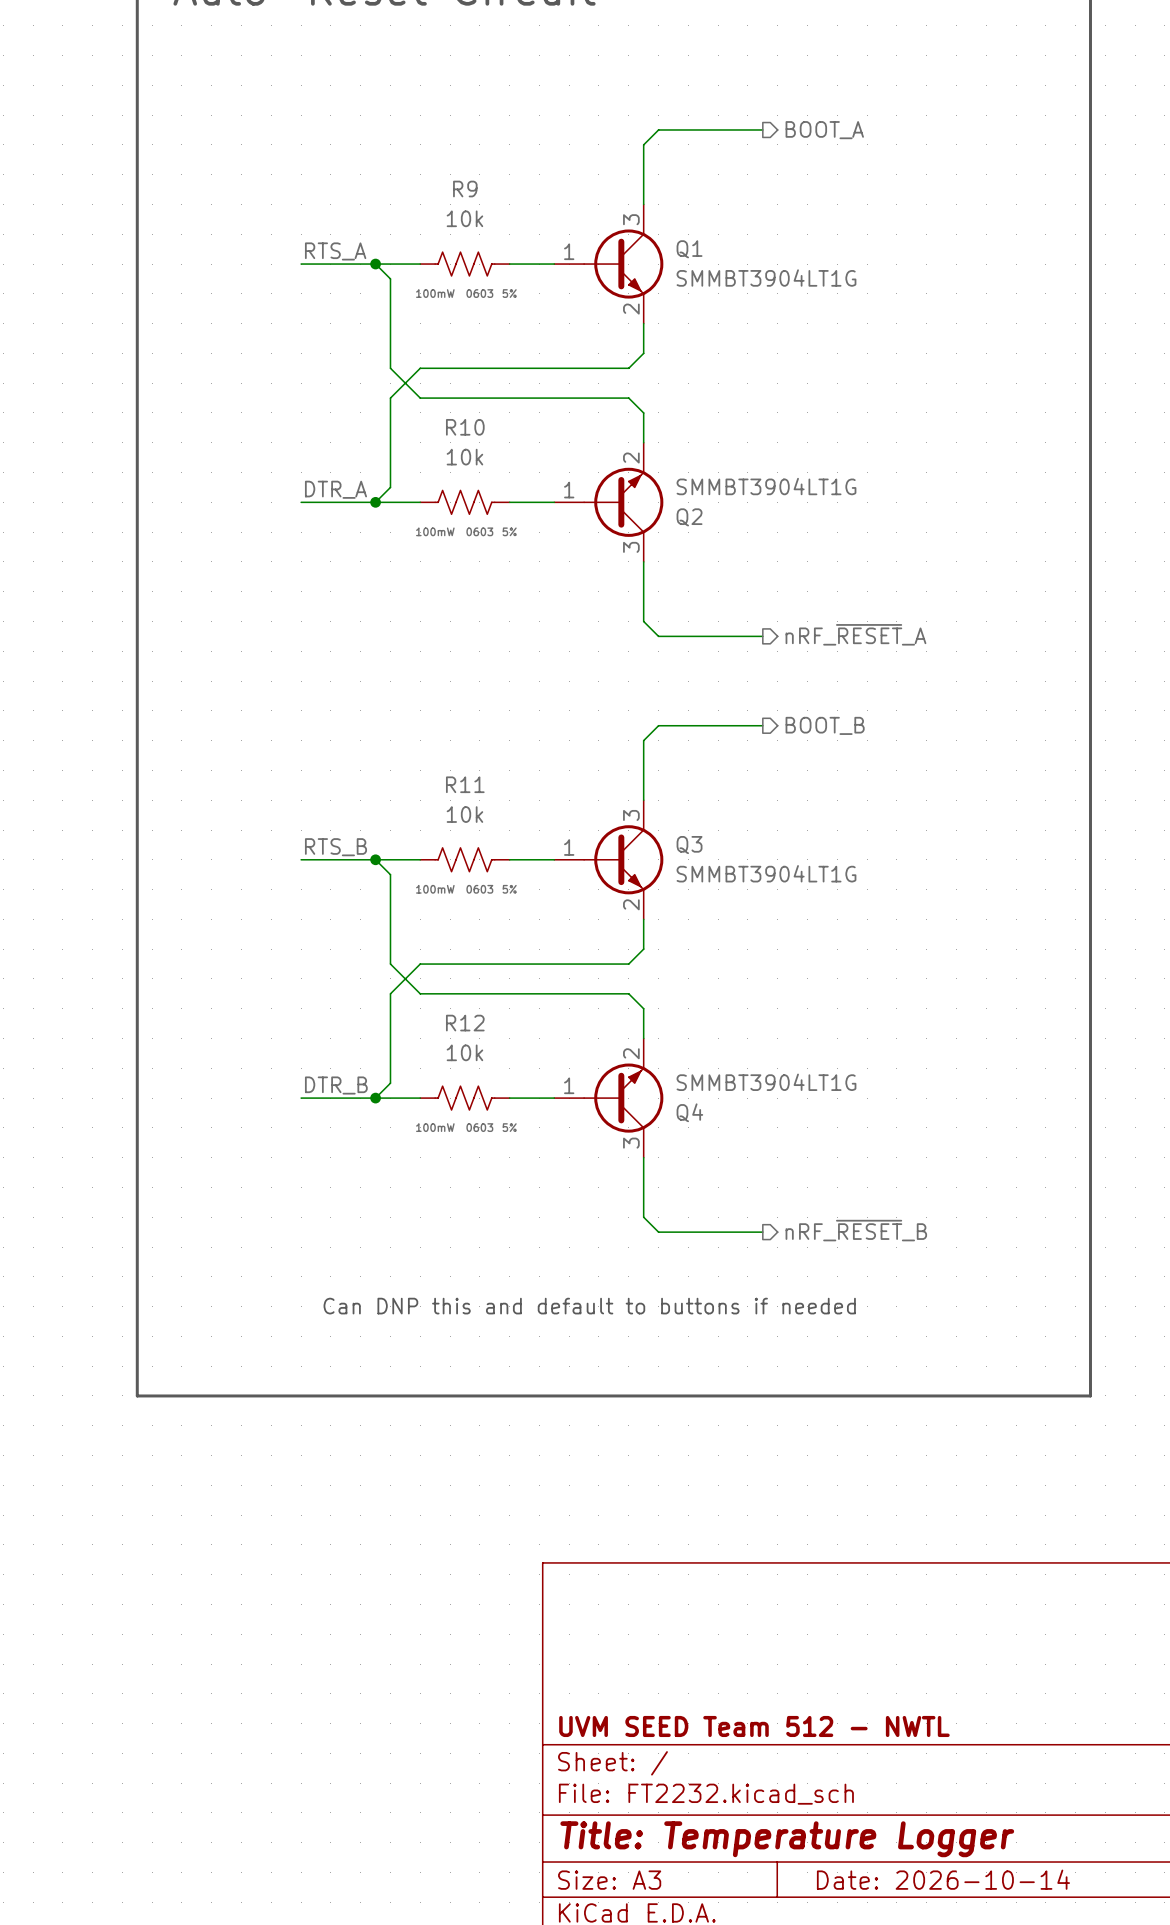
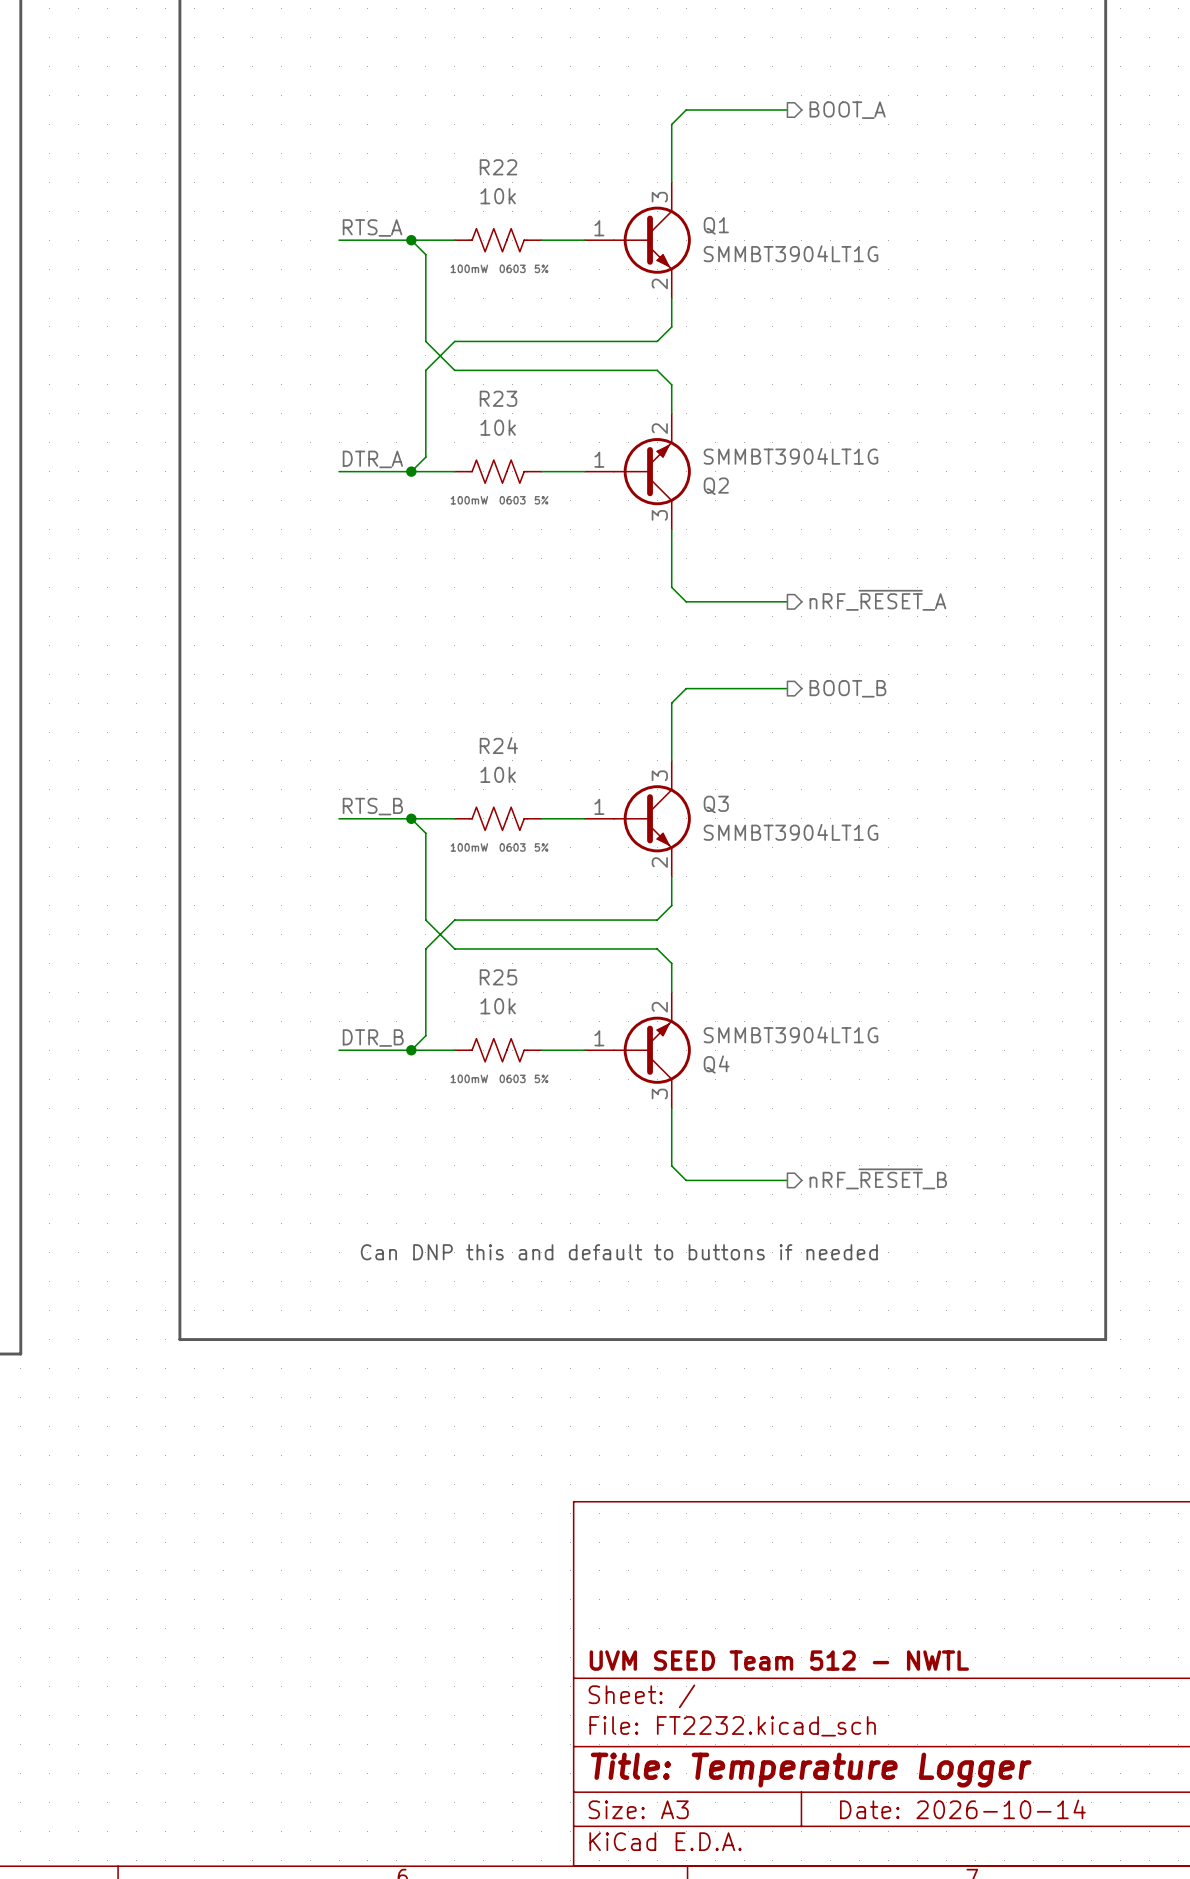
R9 name: R9 (465, 189) -> R22 (498, 167)
R10 name: R10 (465, 427) -> R23 (498, 398)
R11 name: R11 (465, 784) -> R24 (498, 745)
R12 name: R12 (465, 1023) -> R25 (498, 977)

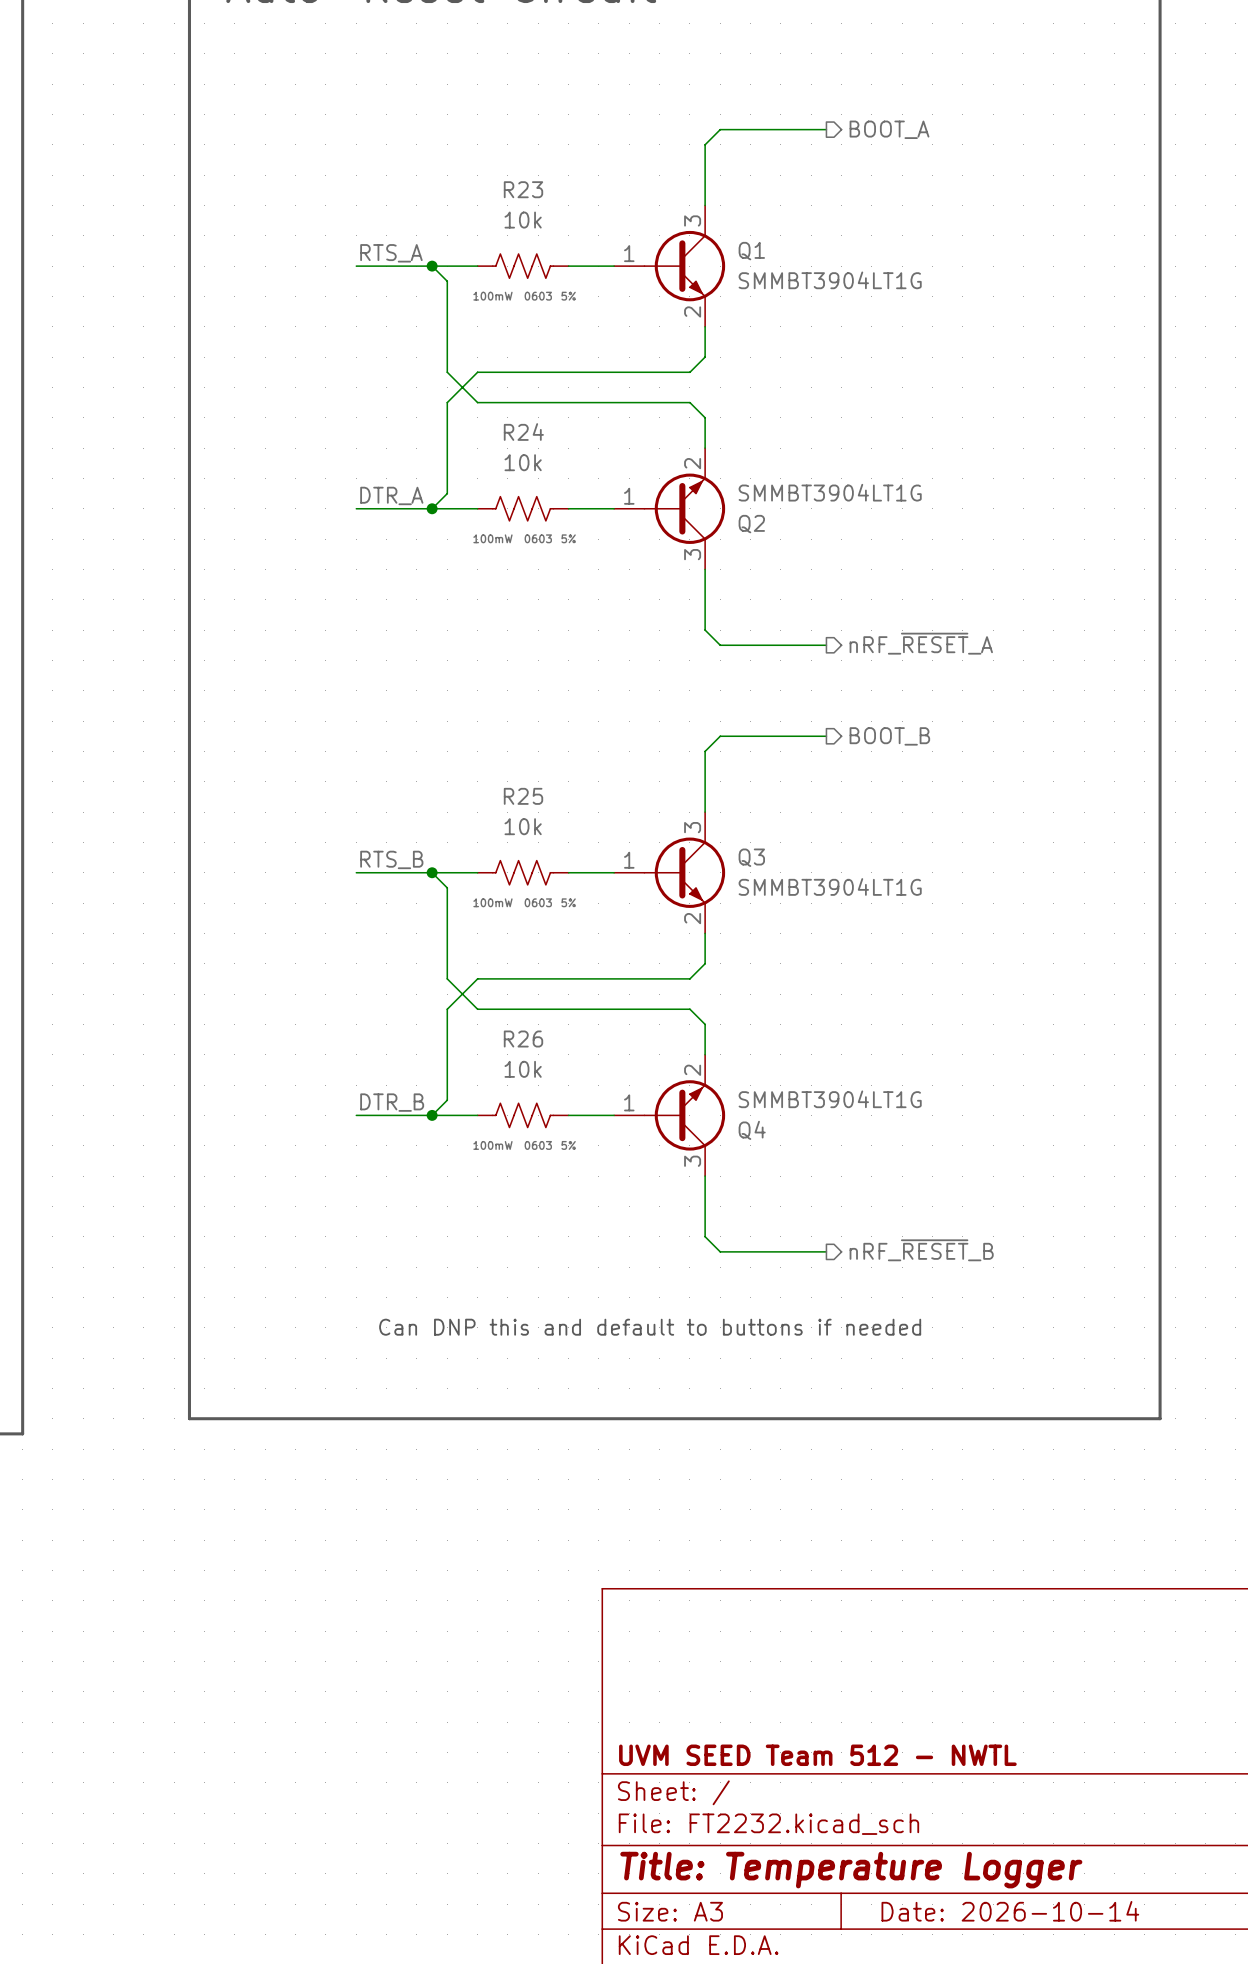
R22 name: R22 (498, 167) -> R23 (523, 189)
R23 name: R23 (498, 398) -> R24 (523, 432)
R24 name: R24 (498, 745) -> R25 (523, 796)
R25 name: R25 (498, 977) -> R26 (523, 1039)

